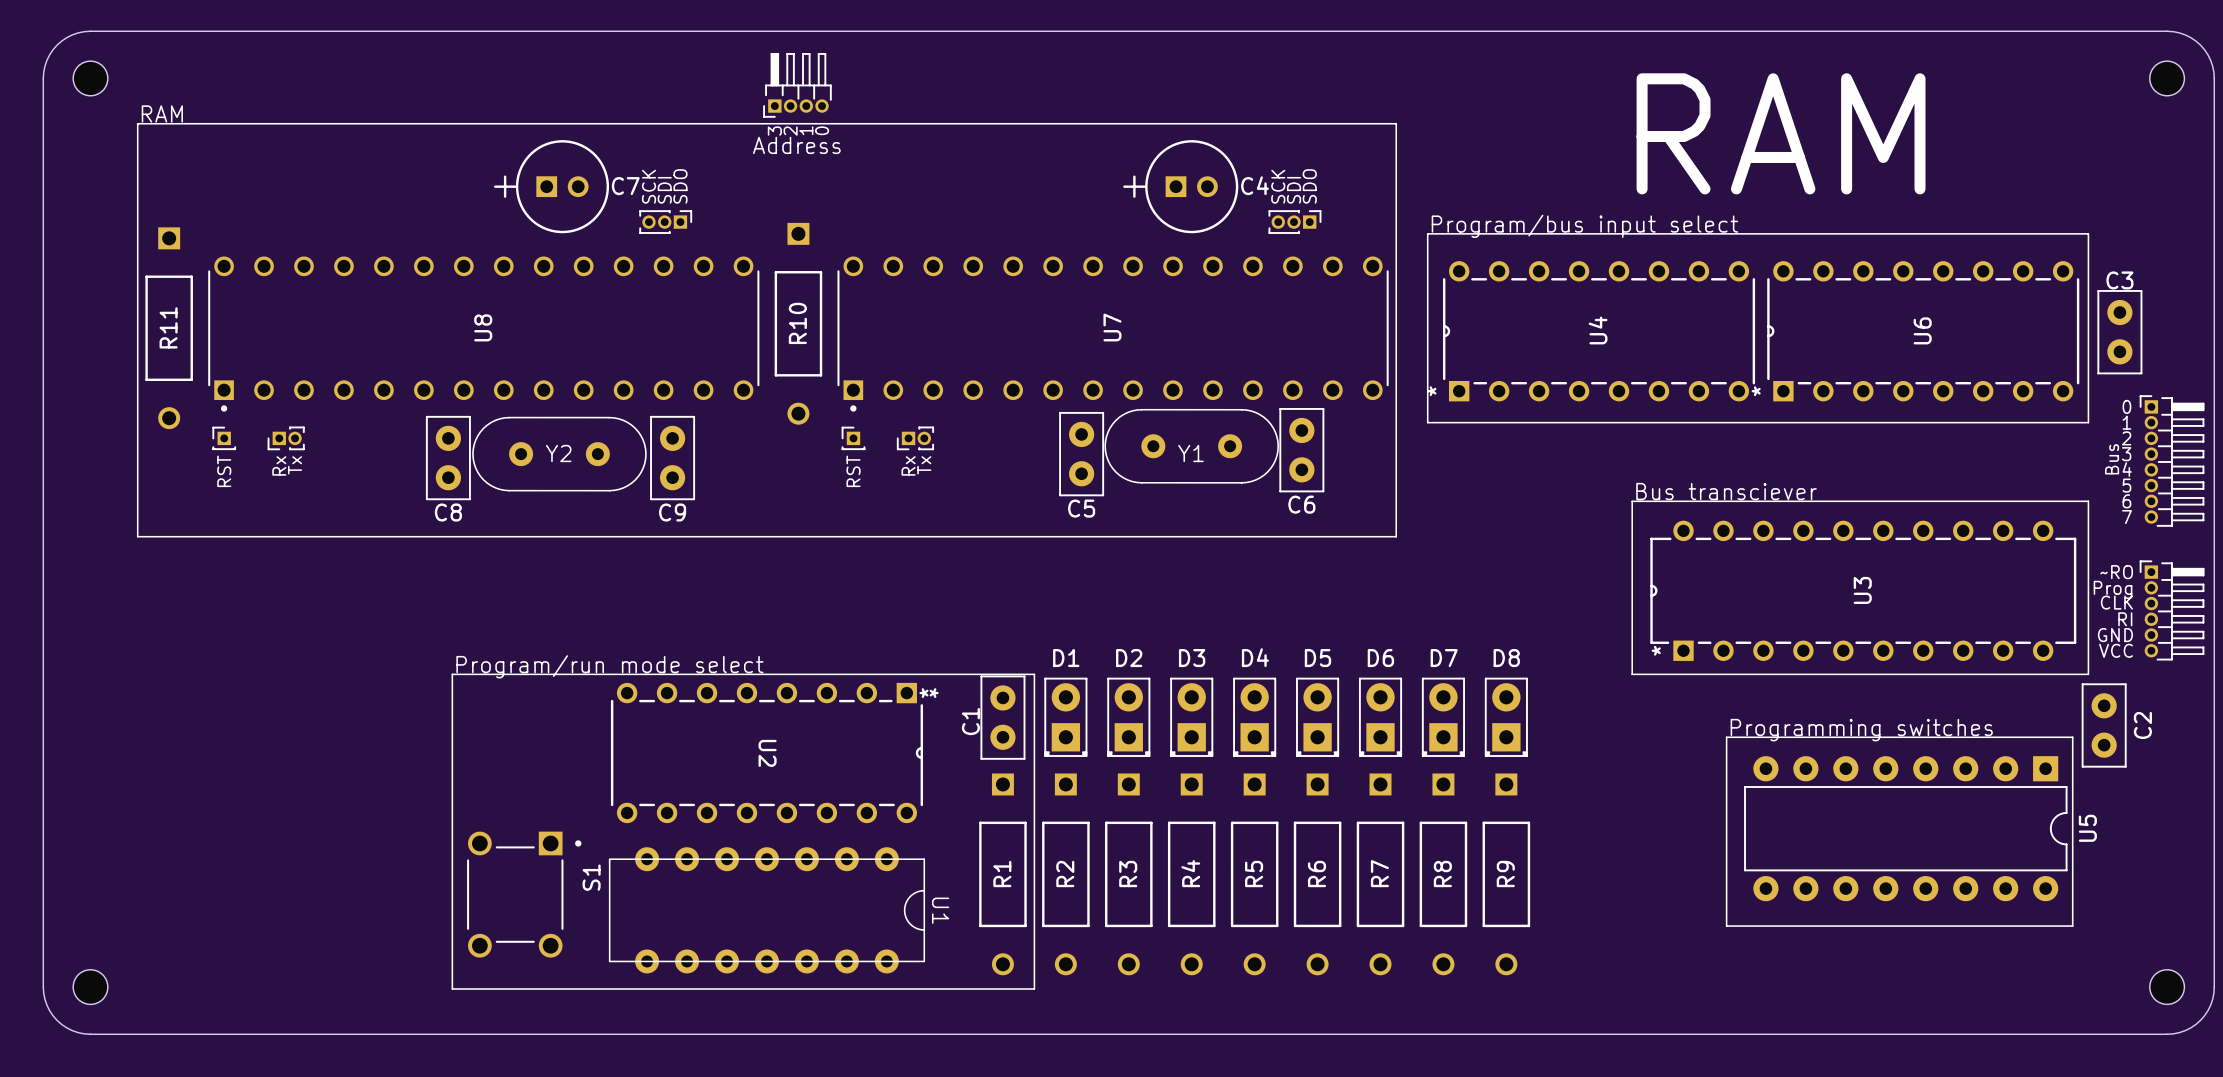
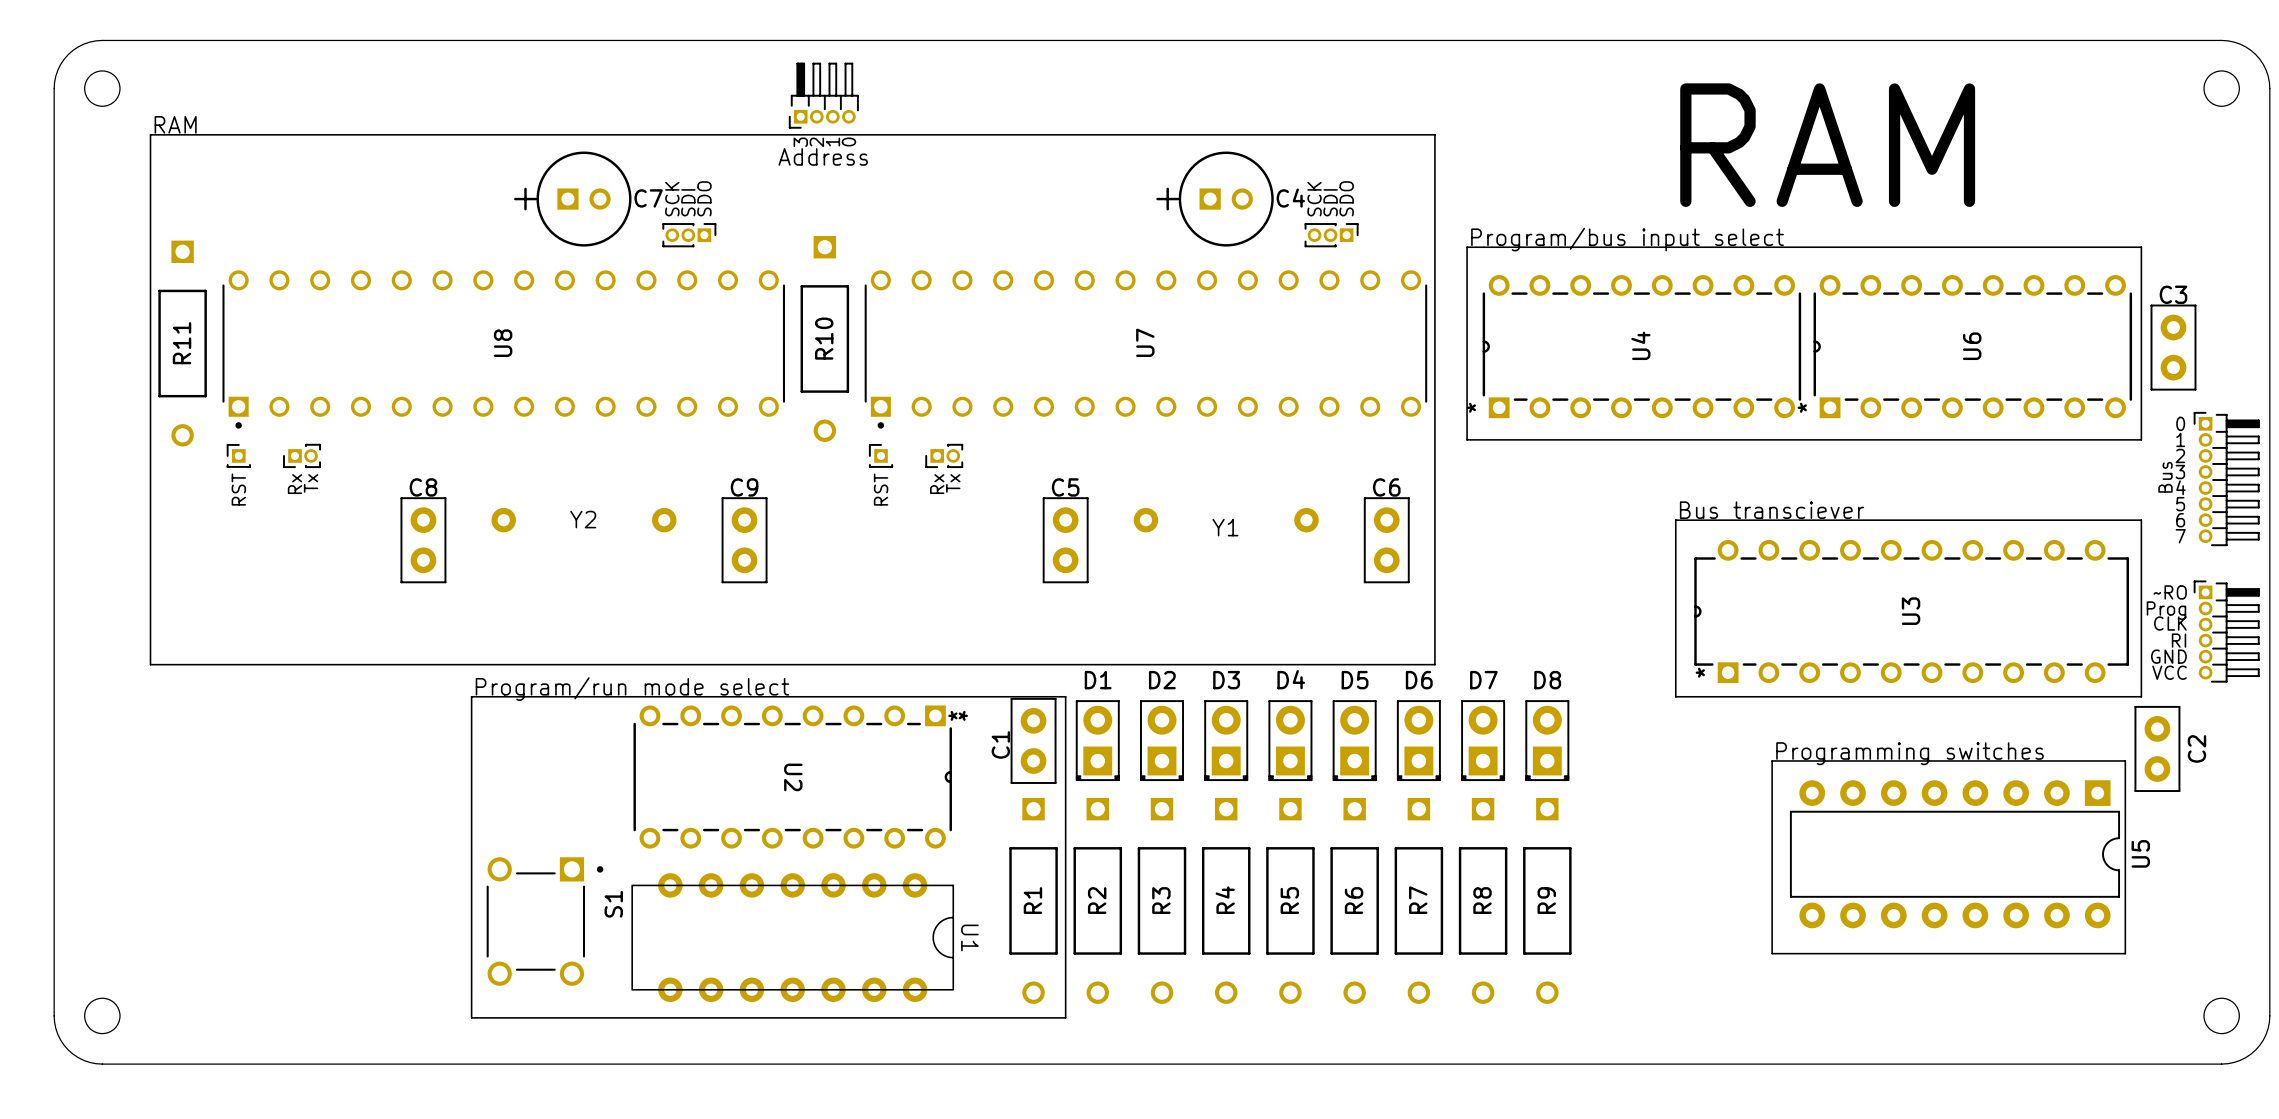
Y1 footprint: [1104, 408, 1280, 484] -> [1133, 507, 1319, 533]
Y2 footprint: [472, 416, 647, 492] -> [491, 507, 677, 533]
C6 position: (1301, 450) -> (1386, 540)
C5 position: (1081, 454) -> (1065, 540)
C8 position: (448, 458) -> (423, 540)
C9 position: (672, 458) -> (744, 540)
C6 name position: C6 (1301, 504) -> C6 (1386, 487)
C5 name position: C5 (1081, 508) -> C5 (1065, 487)
C8 name position: C8 (448, 512) -> C8 (423, 487)
C9 name position: C9 (672, 512) -> C9 (744, 487)
line: (137, 536) (1396, 536) -> (150, 556) (150, 664) (1434, 664) (1434, 556)

